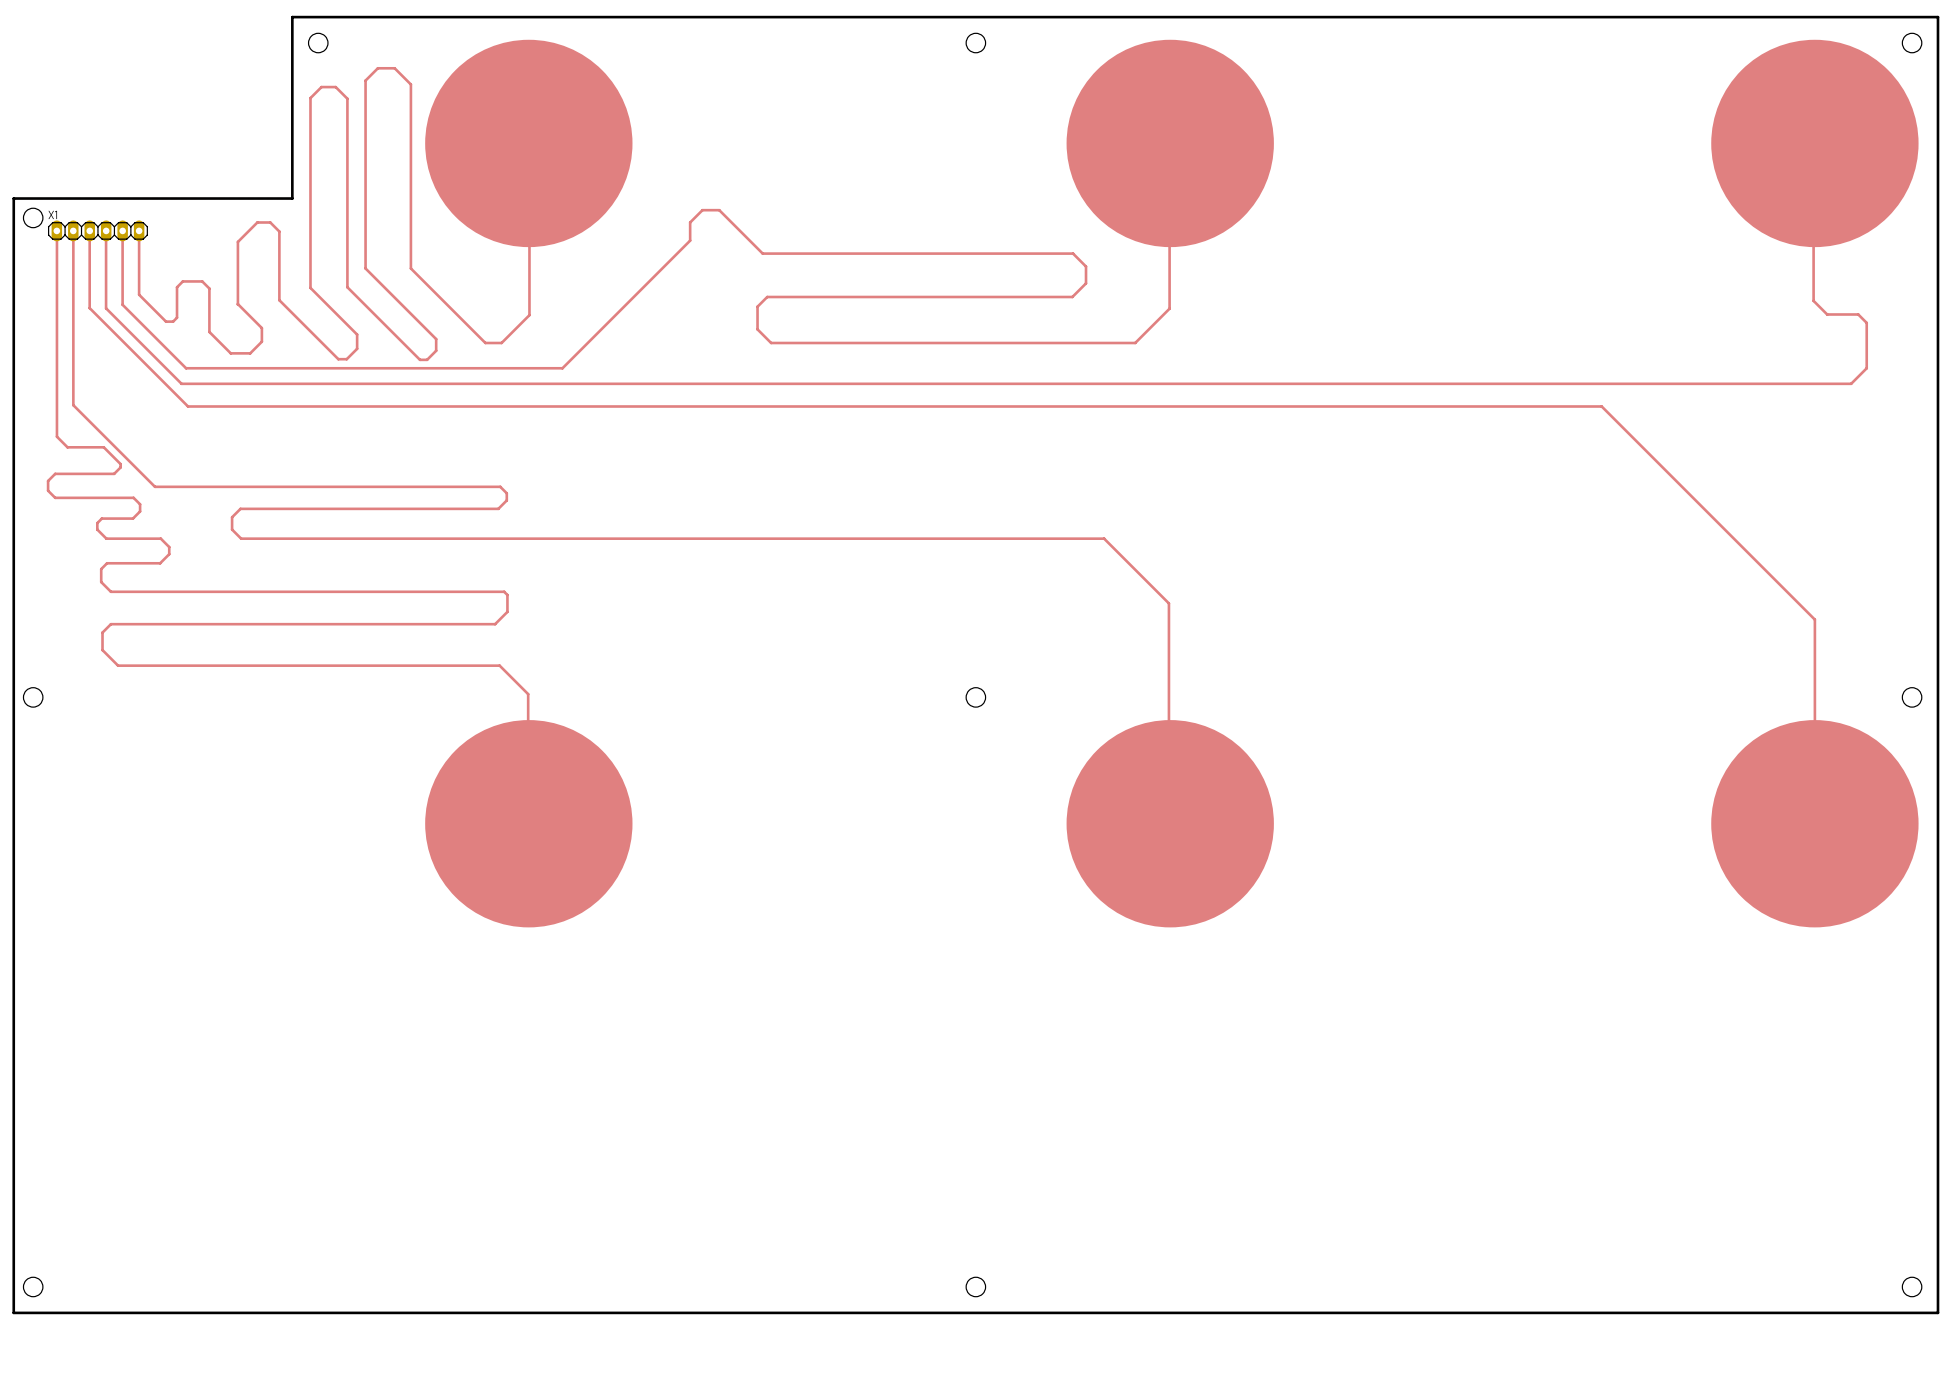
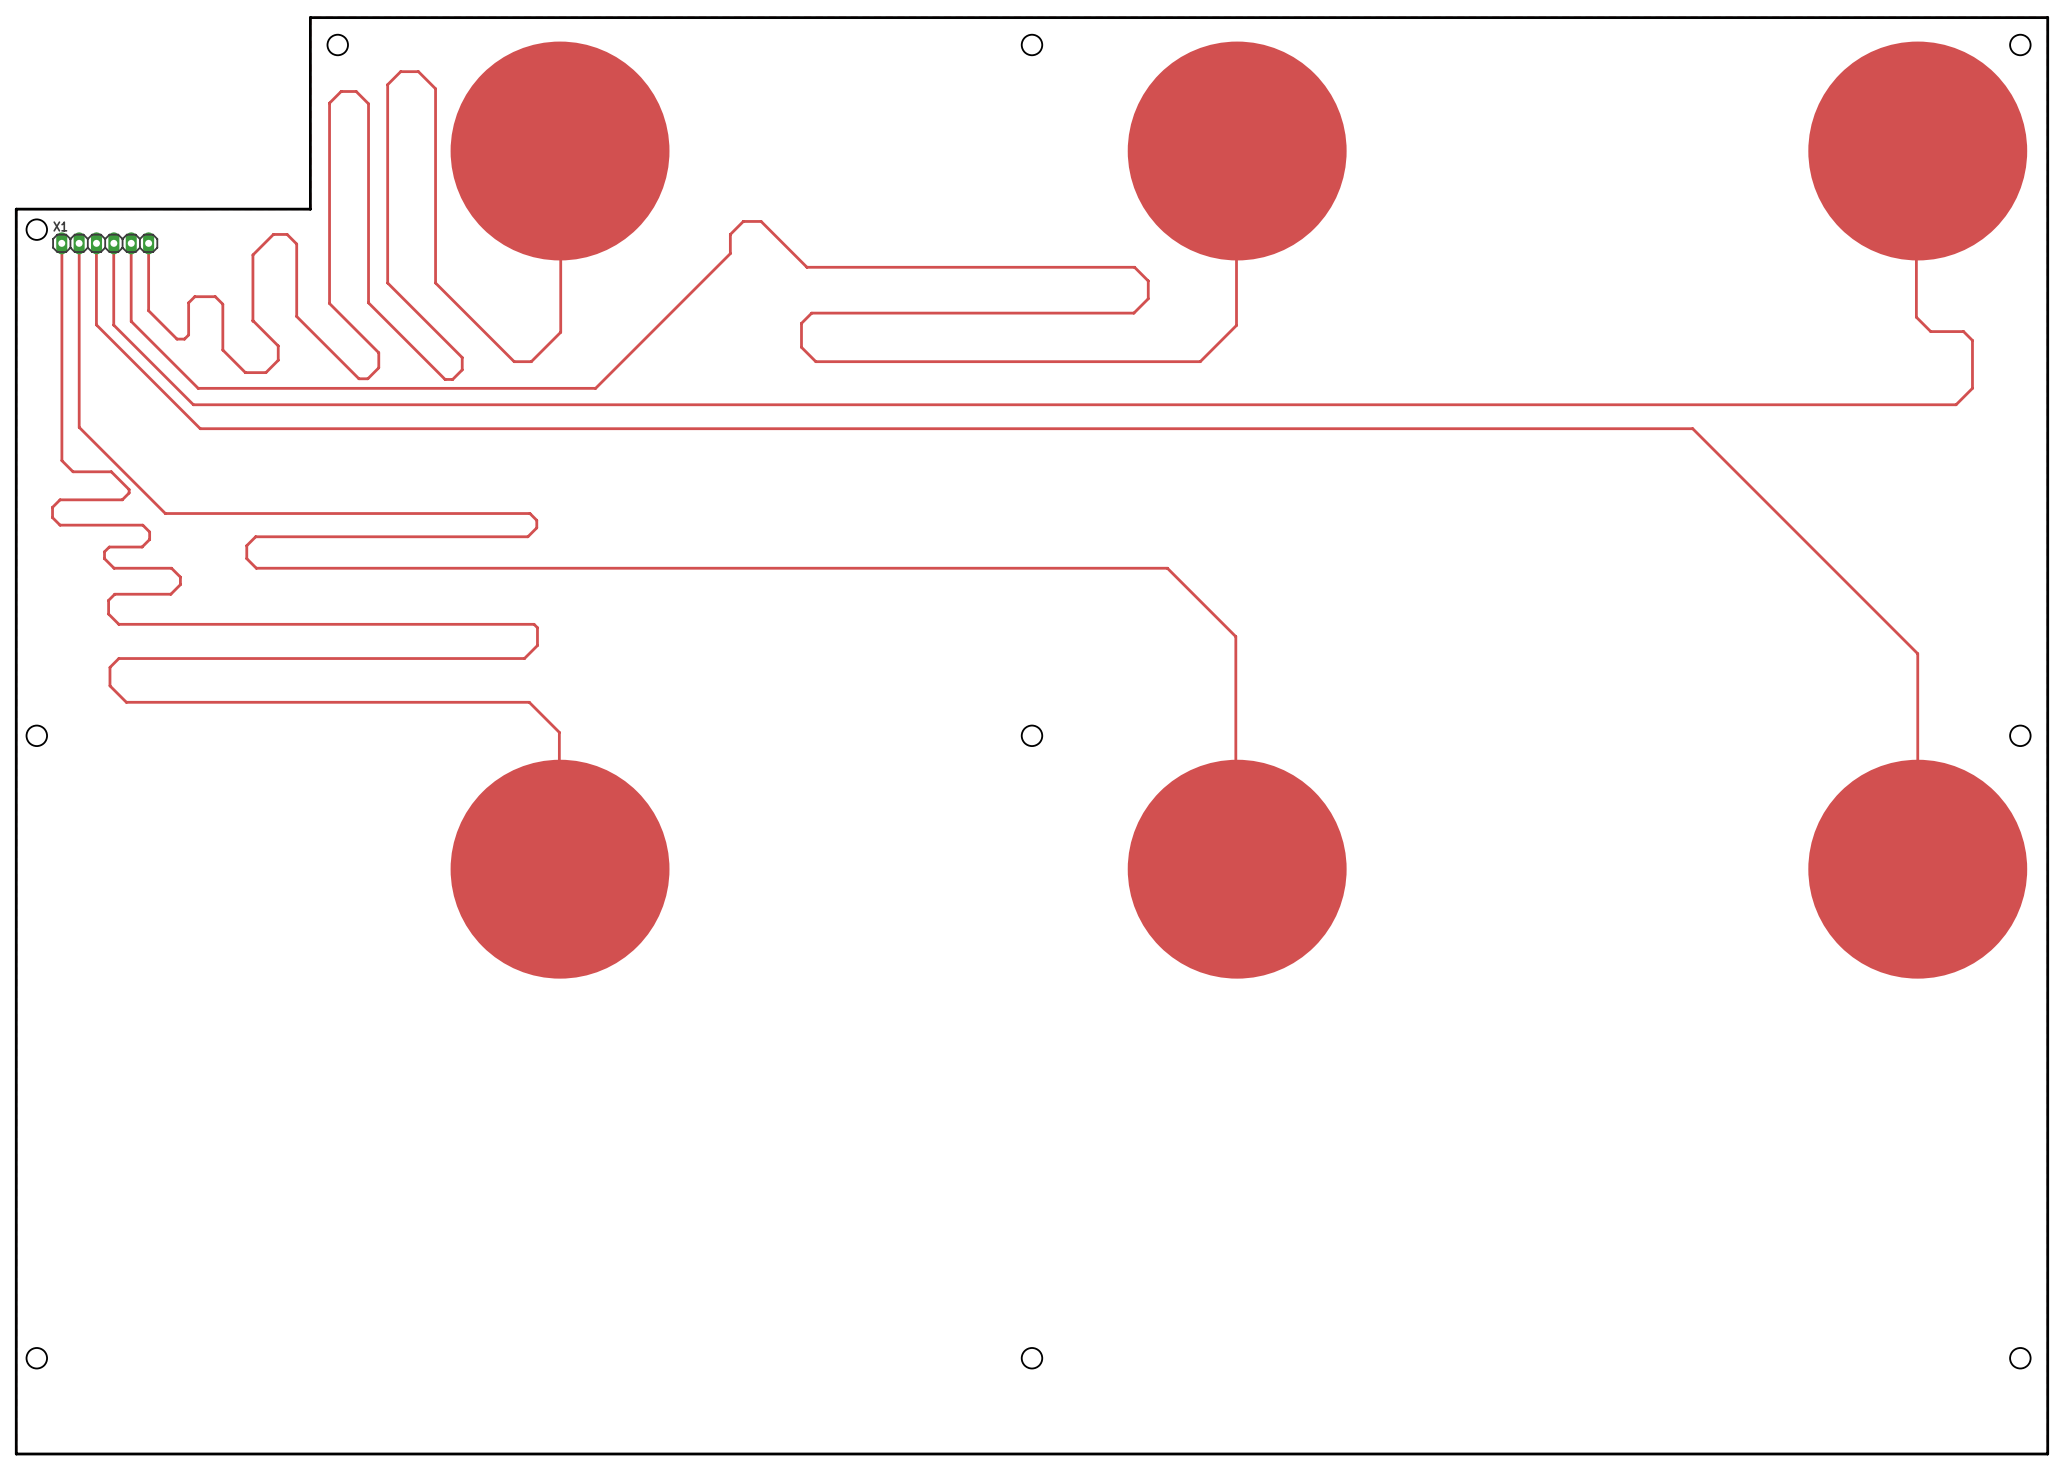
board edge: (13, 1312) (1937, 1312) -> (16, 1385) (16, 1454) (2047, 1454) (2047, 1385)

